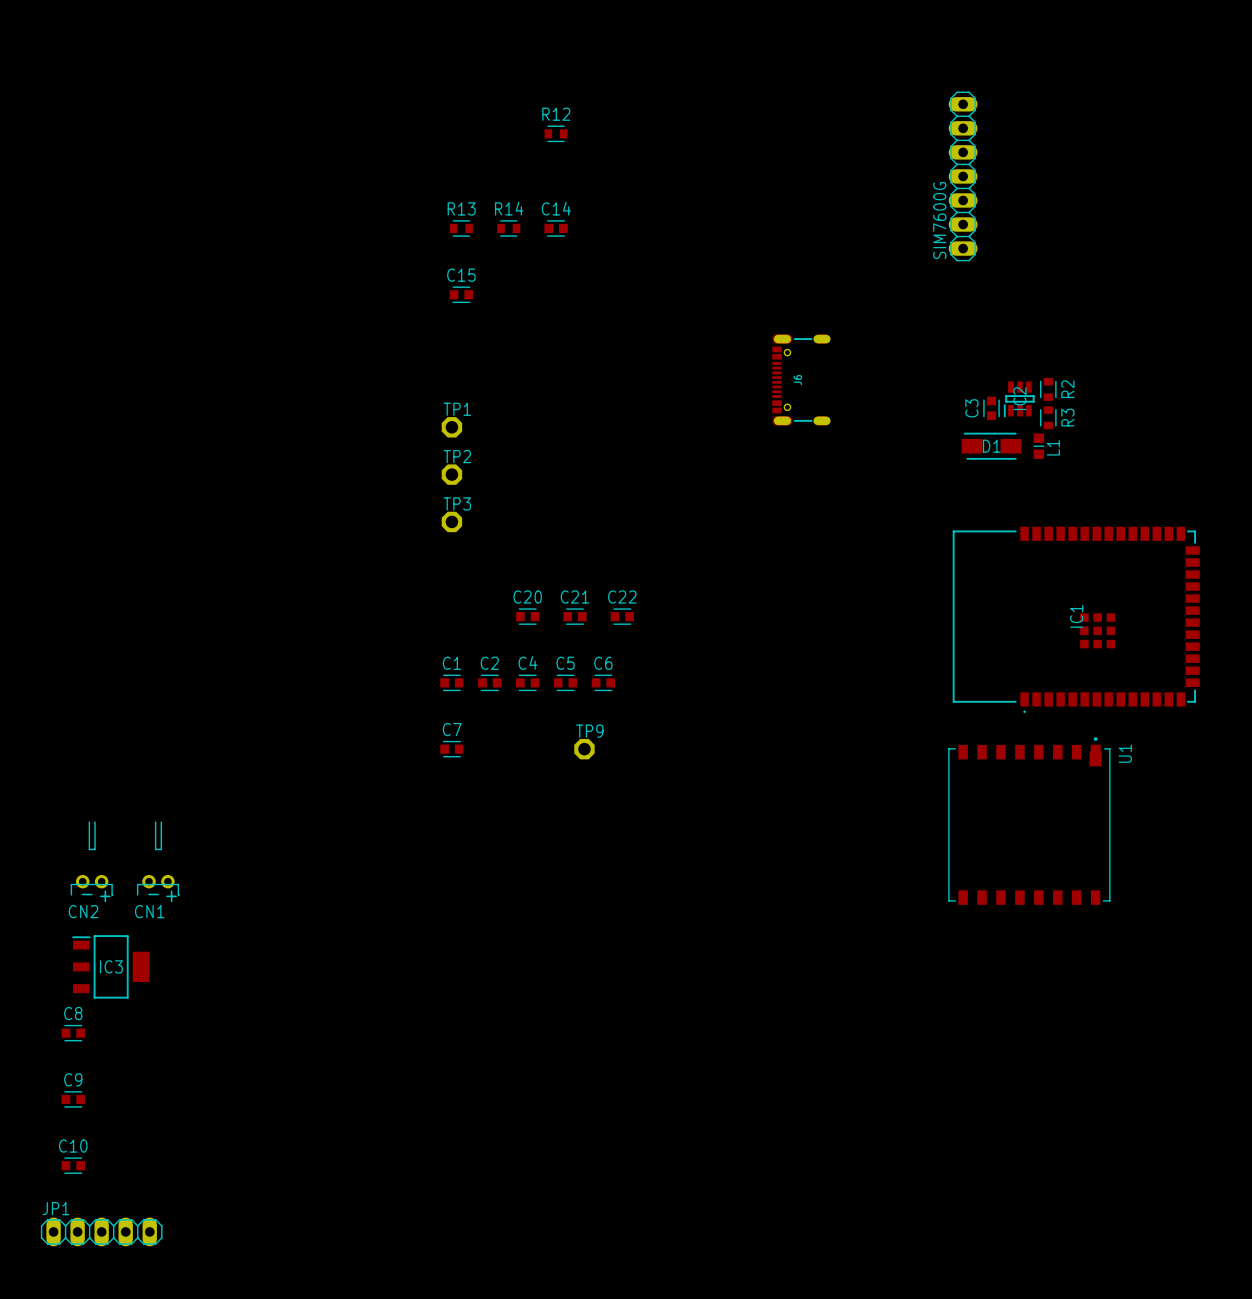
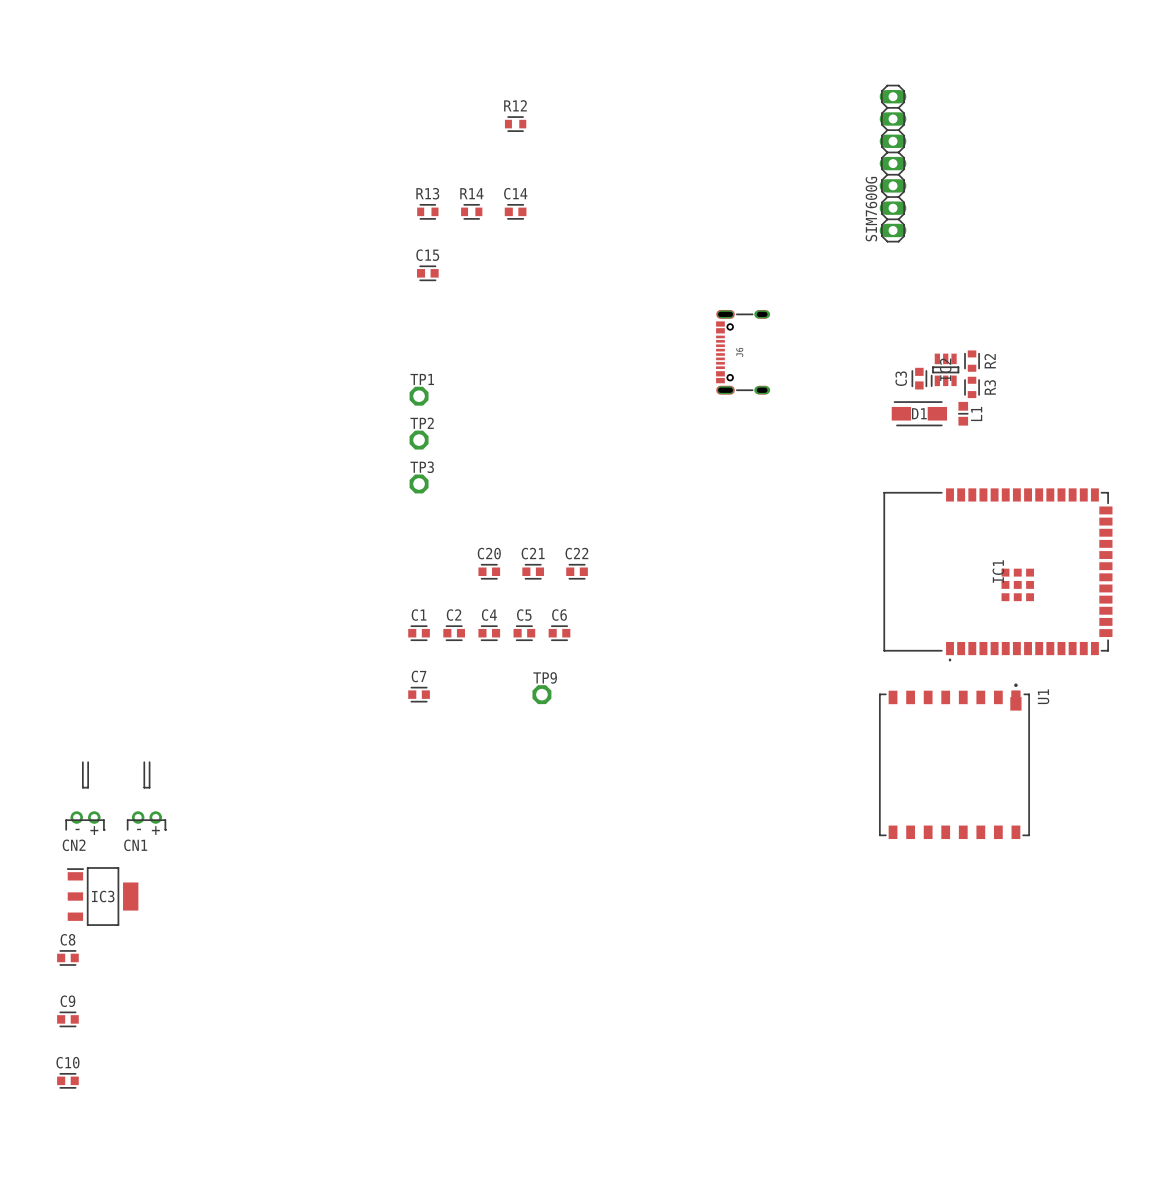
JP1: (101, 1231) -> none

